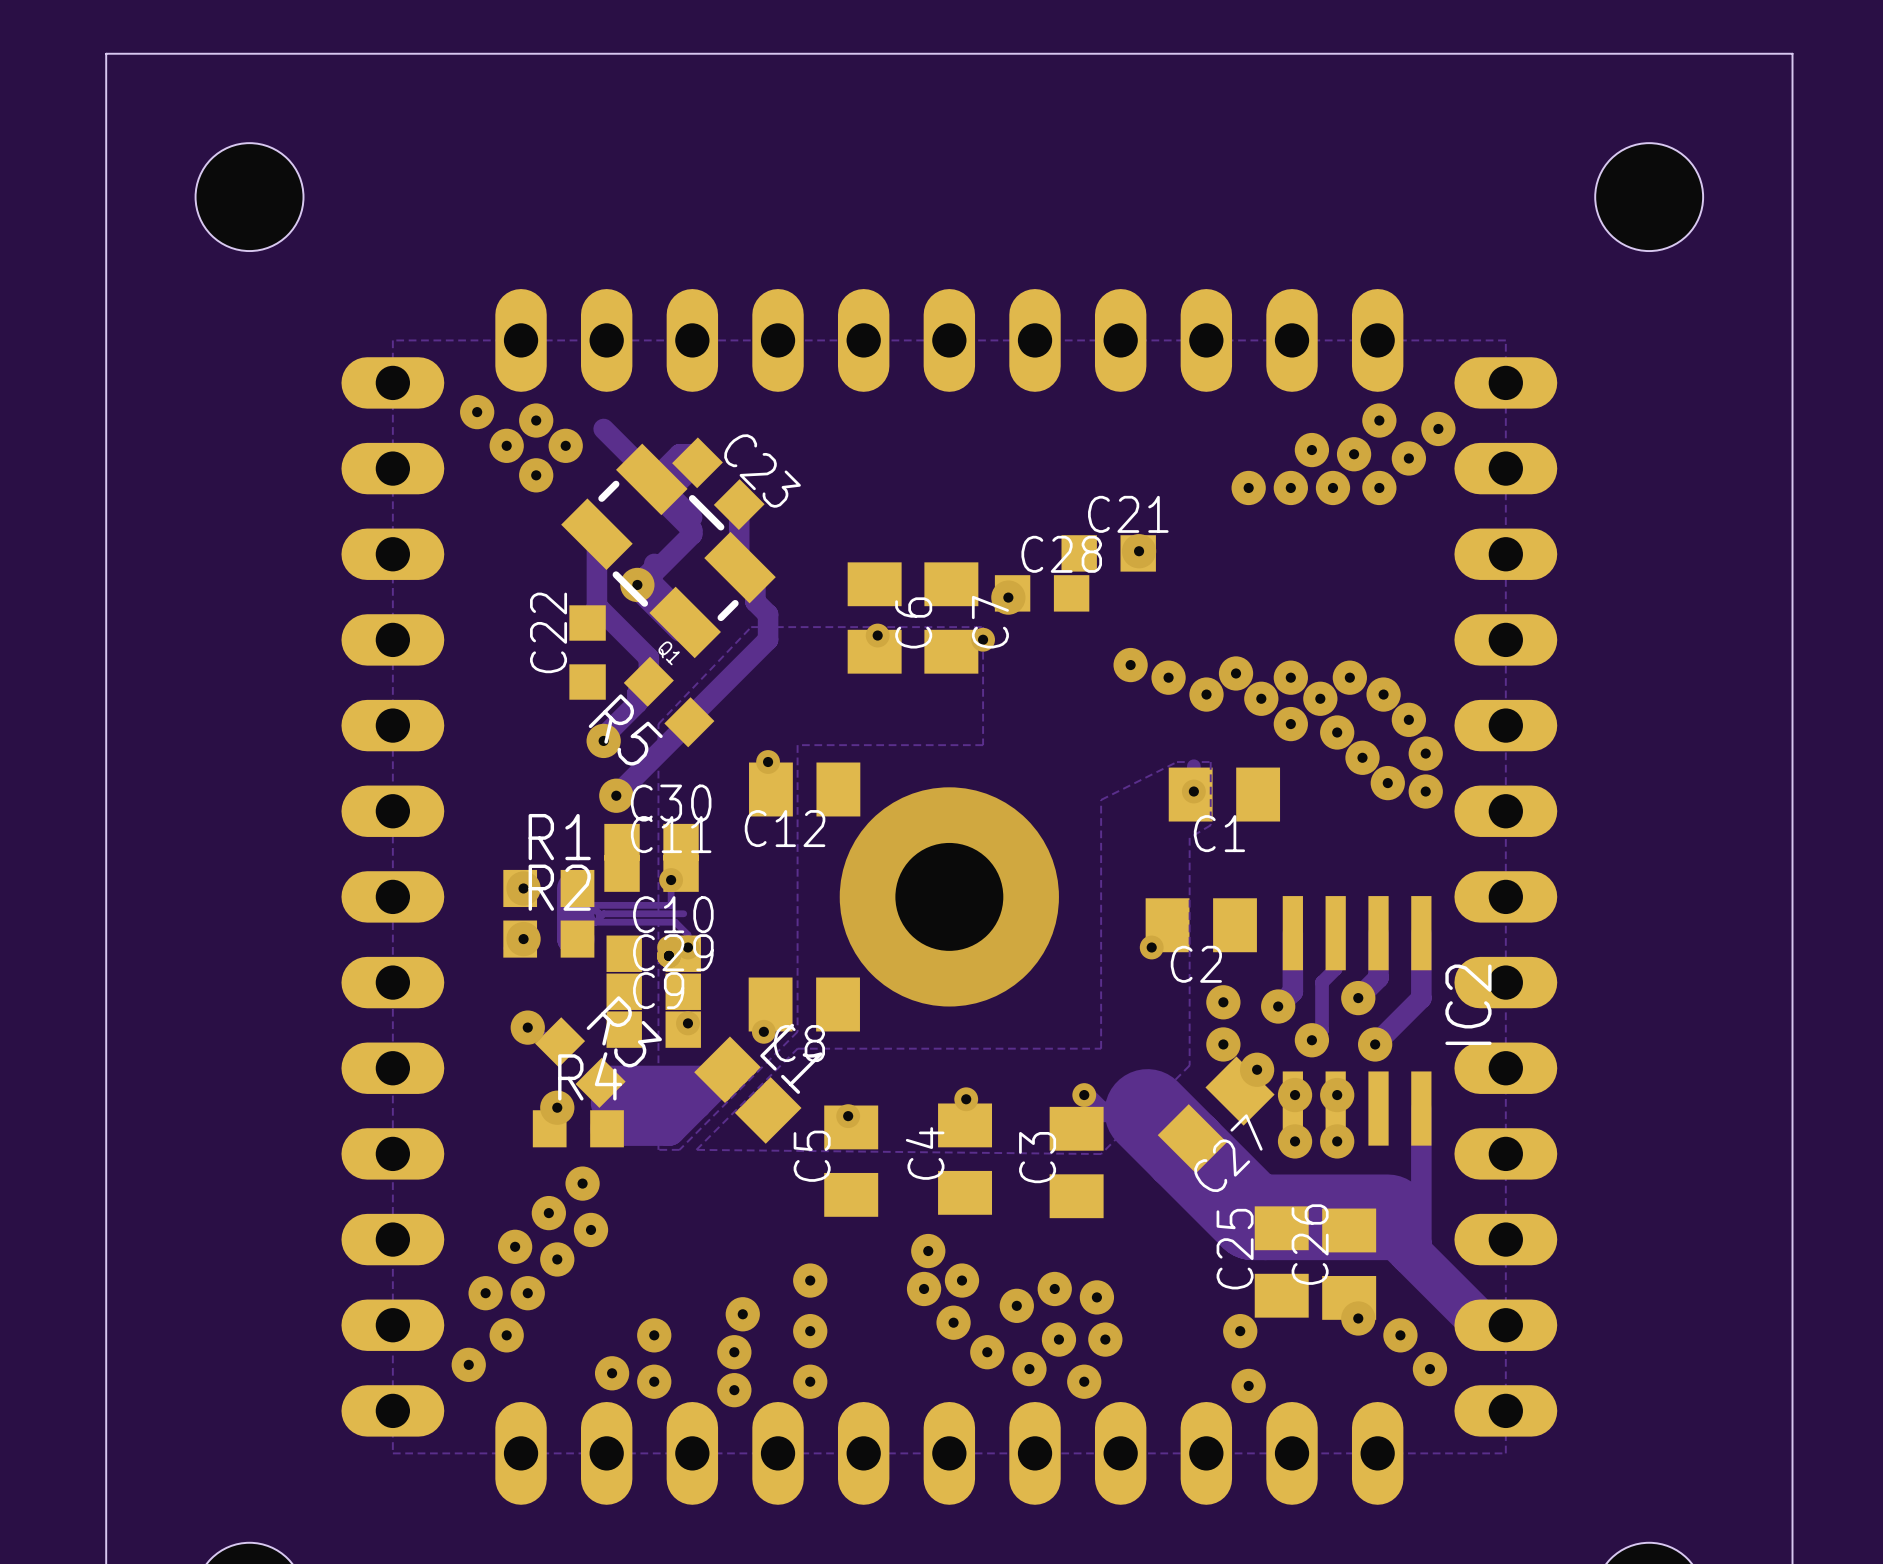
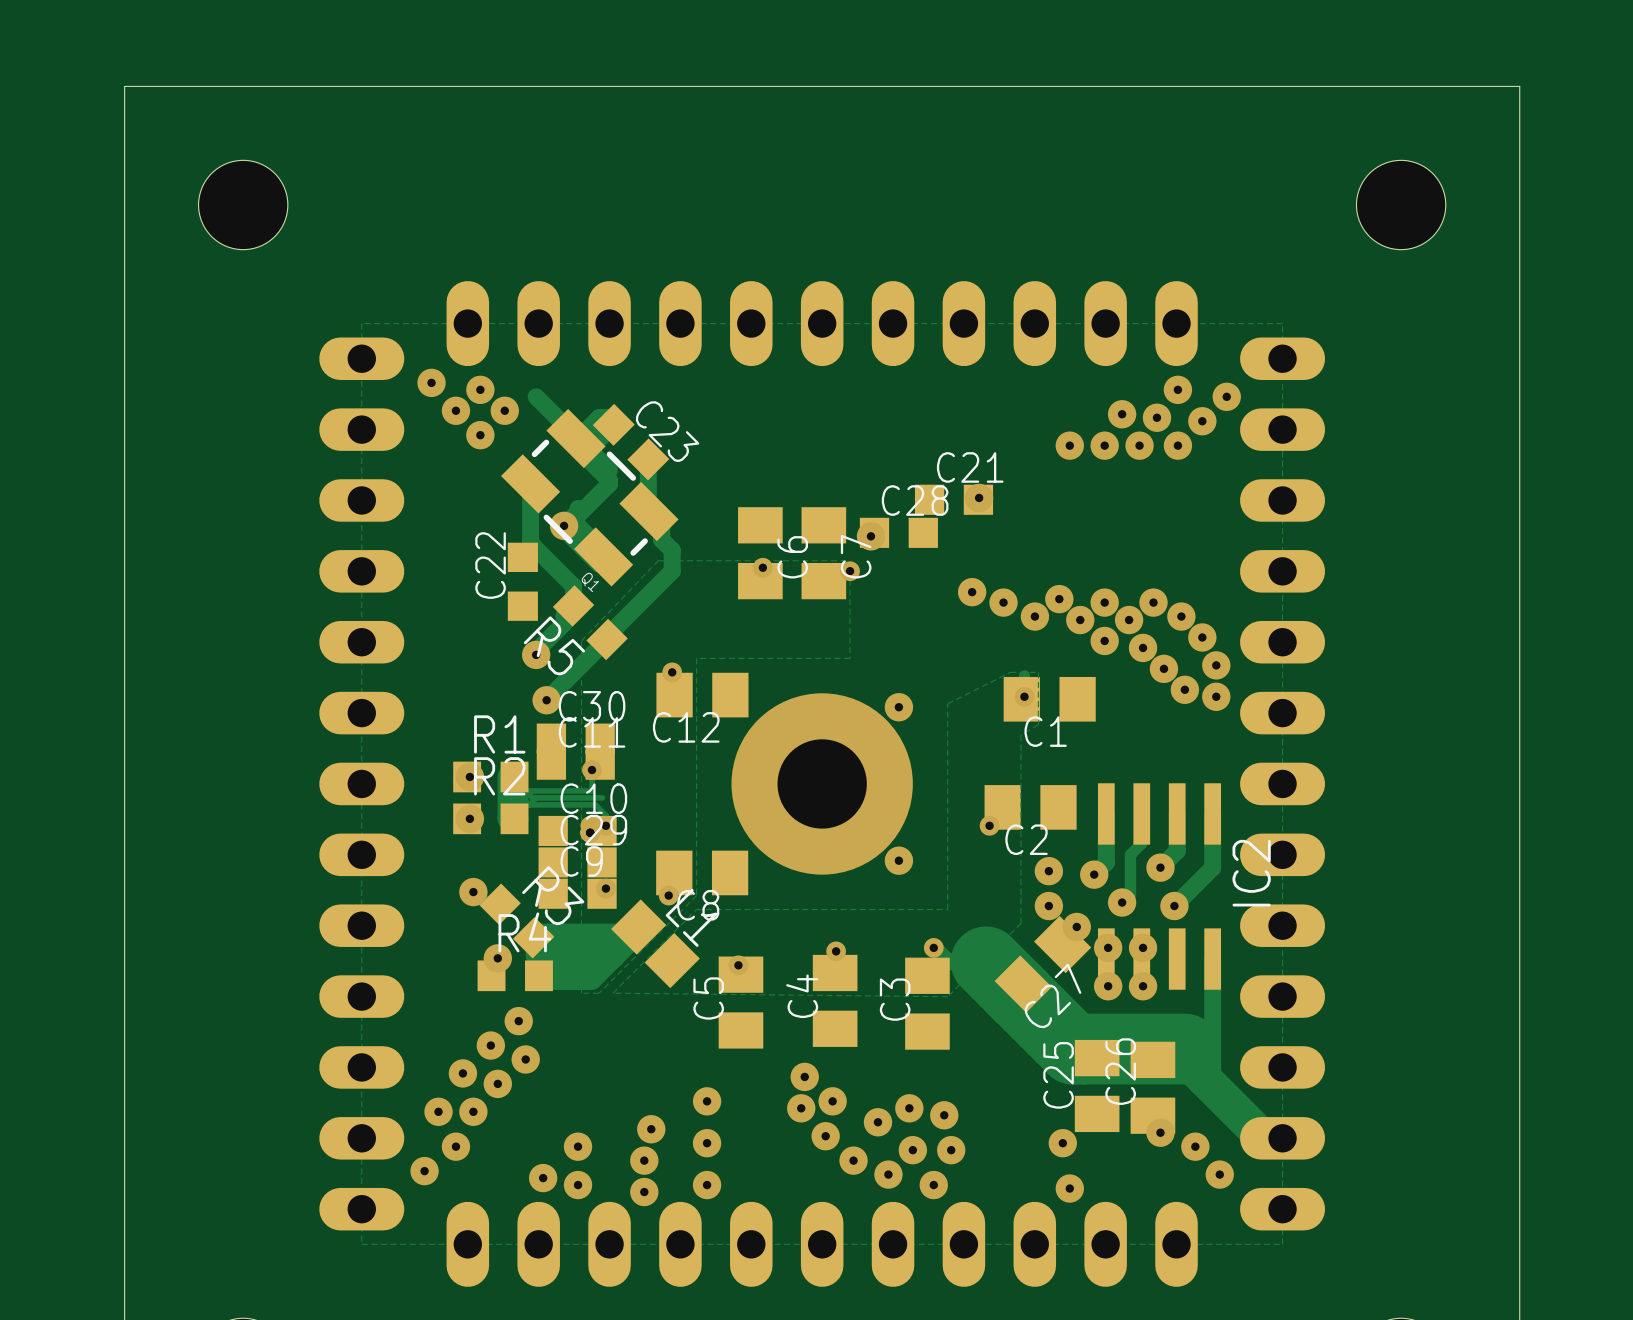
via: none -> (898, 707)
via: none -> (898, 860)

